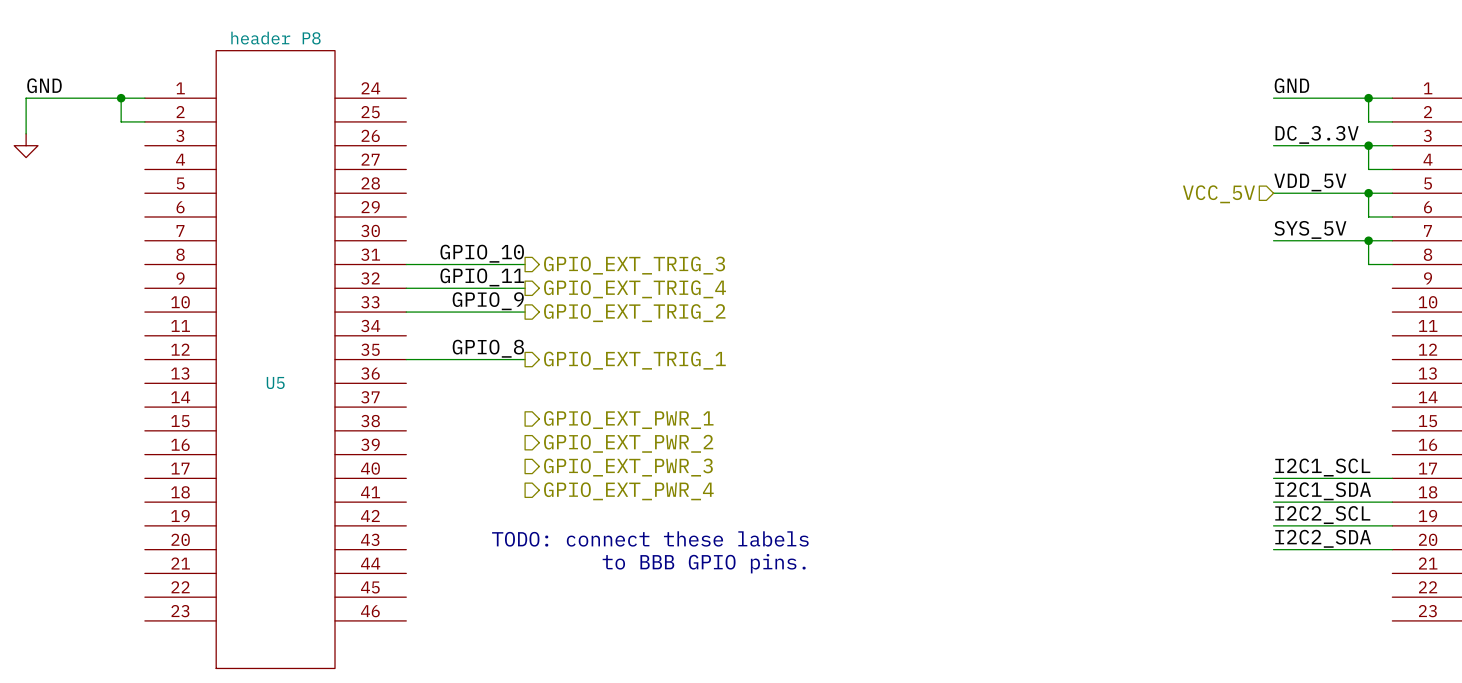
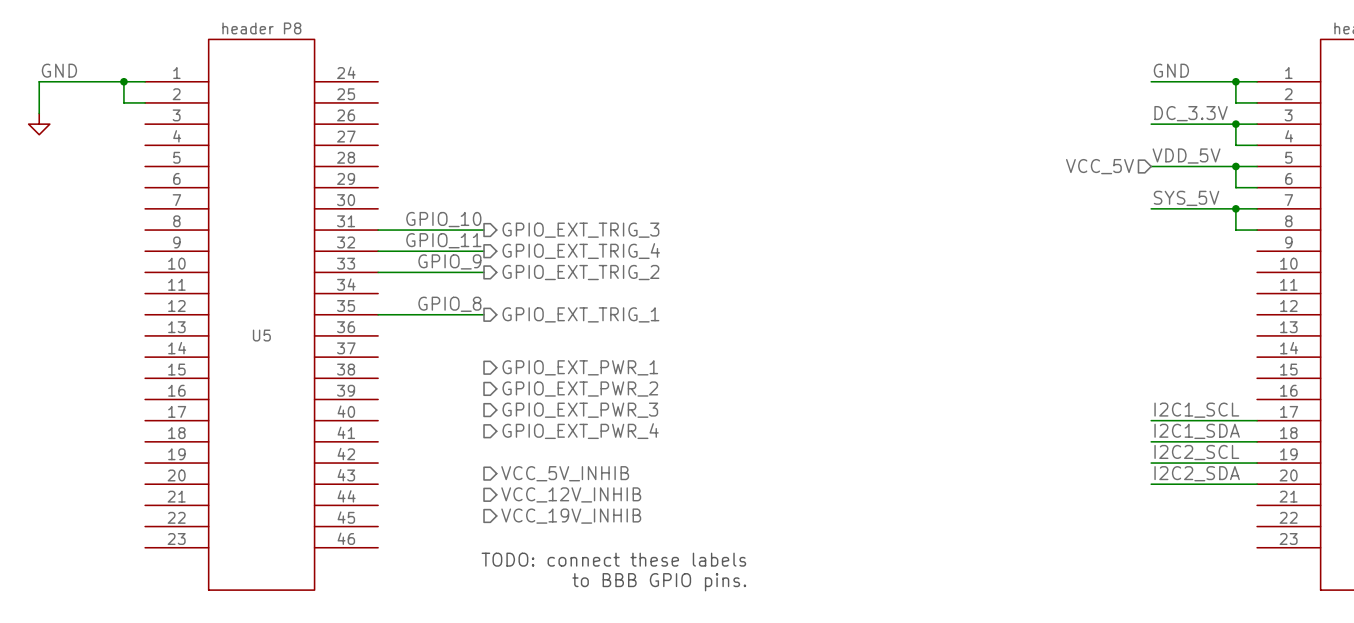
hierarchical label: none -> VCC_5V_INHIB (565, 473)
text position: TODO: connect these labels (650, 538) -> TODO: connect these labels (613, 559)
hierarchical label: none -> VCC_12V_INHIB (571, 494)
text position: to BBB GPIO pins. (704, 563) -> to BBB GPIO pins. (659, 582)
hierarchical label: none -> VCC_19V_INHIB (571, 516)

